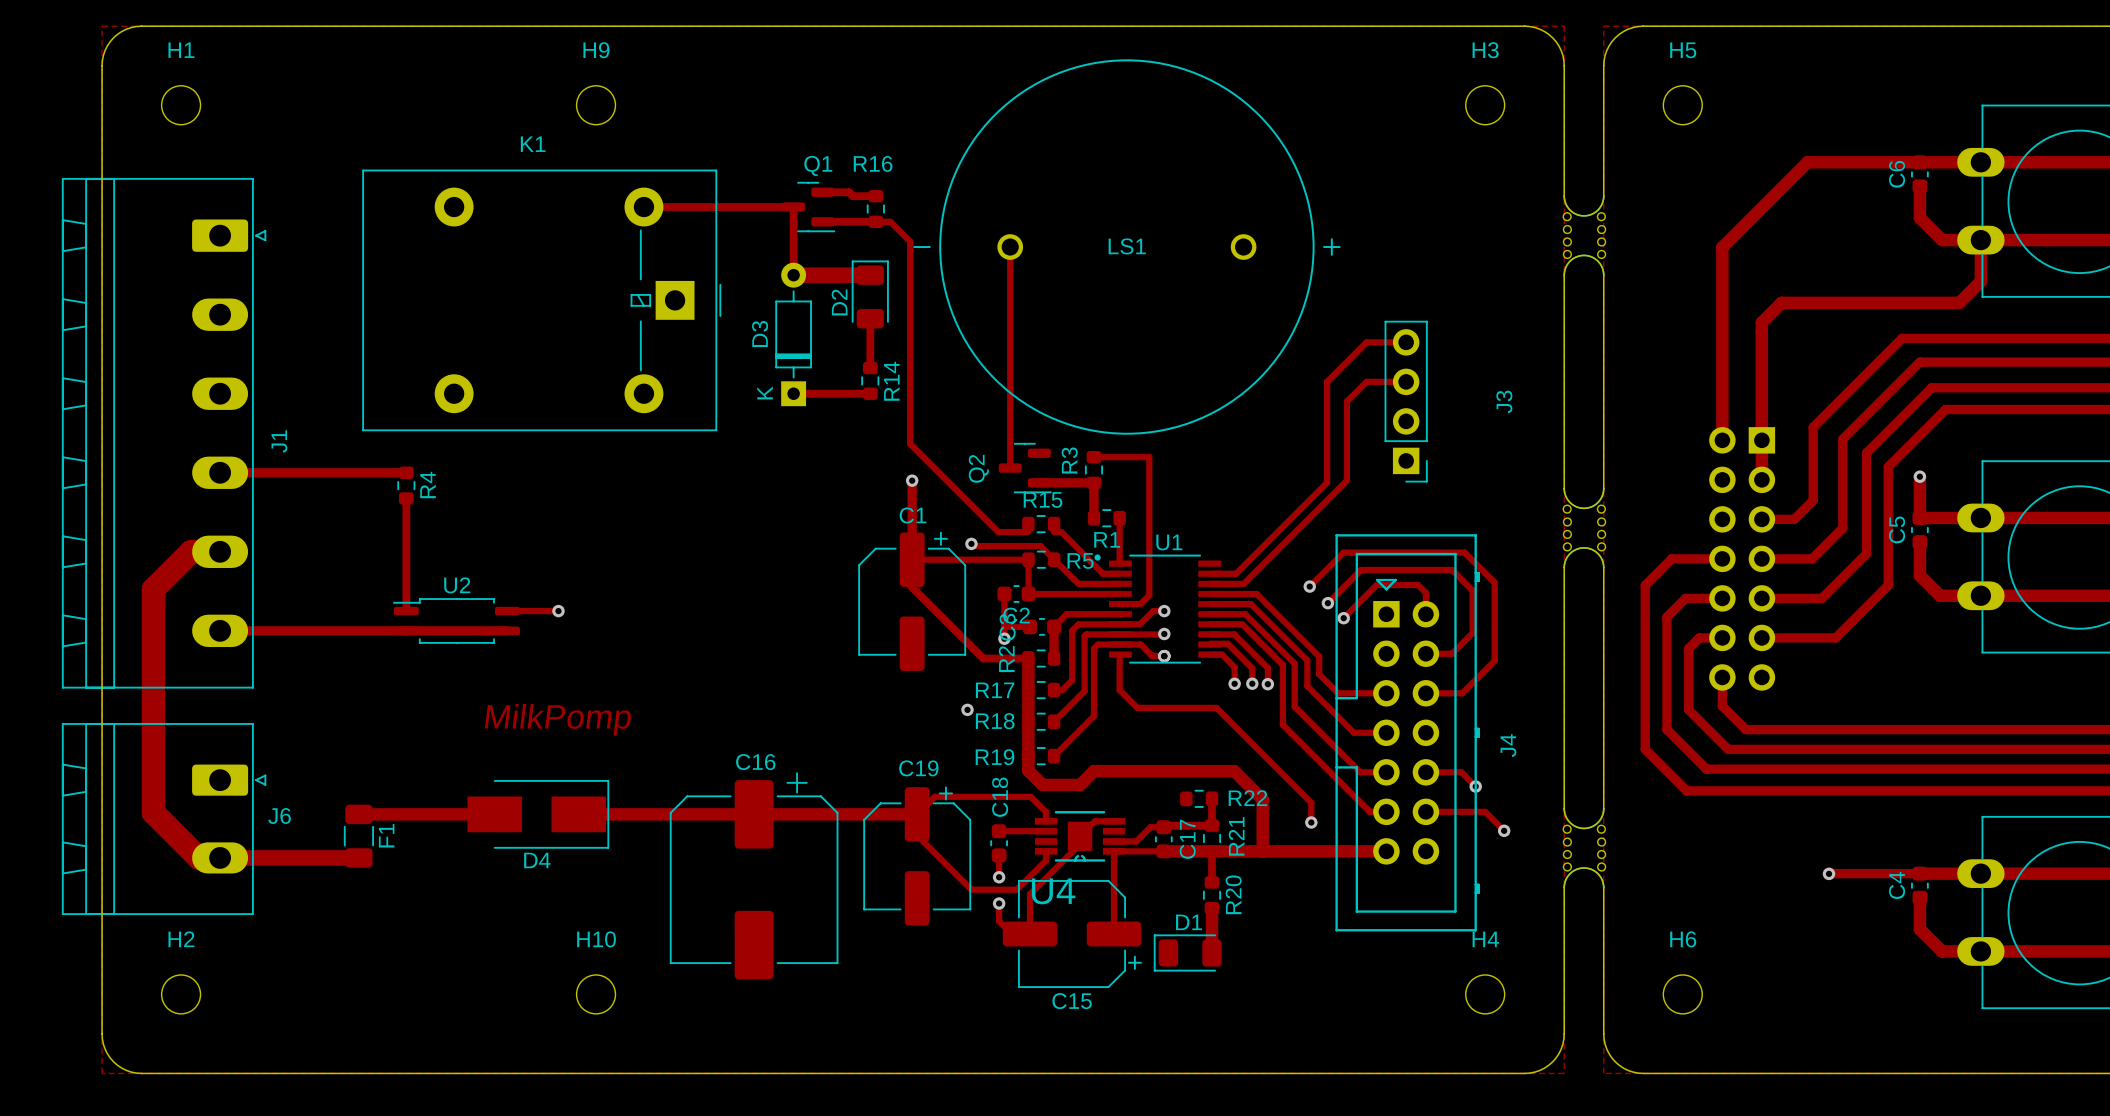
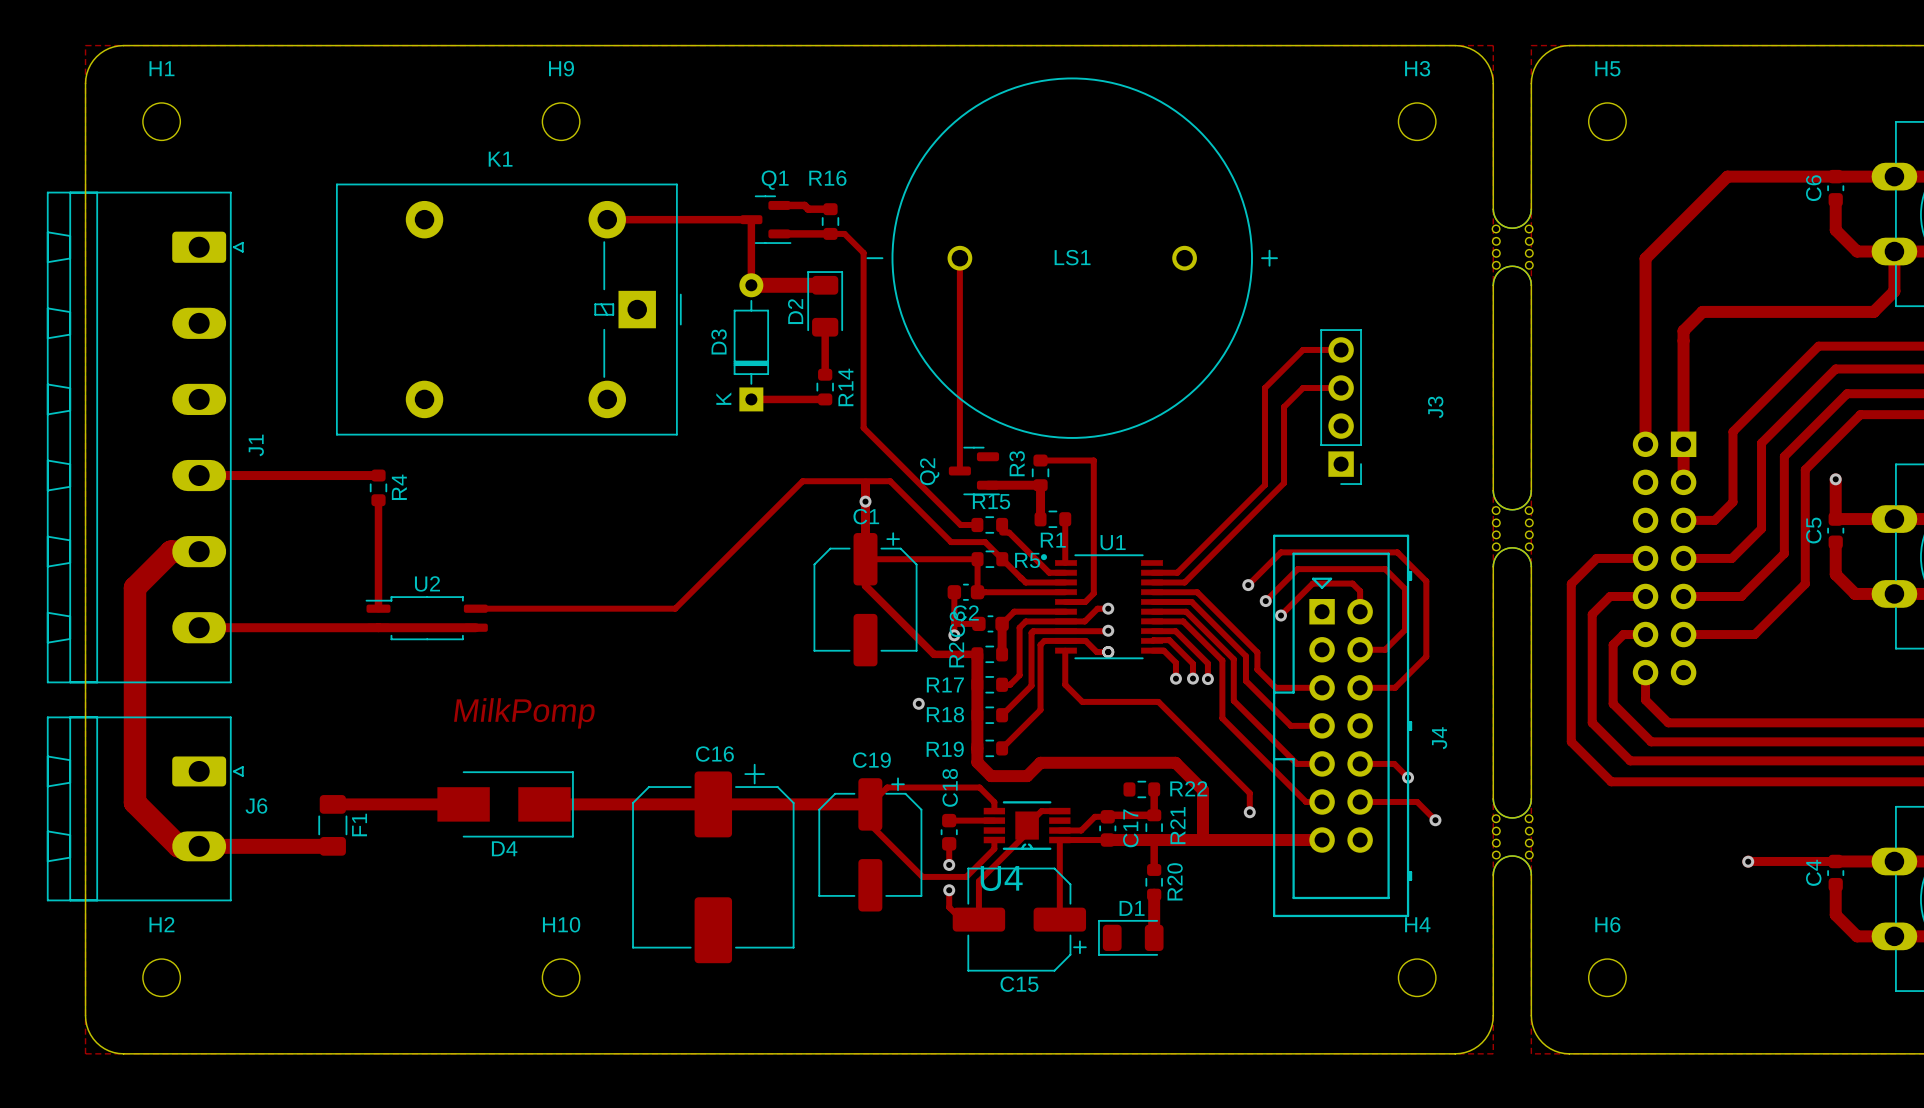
track: (910, 423) (910, 443) (998, 532) (1028, 532) -> (863, 427) (960, 524) (977, 524)
via position: (912, 480) -> (865, 501)
track: (971, 543) (973, 546) (1040, 546) -> (524, 608) (675, 608) (802, 481) (890, 481) (951, 542) (985, 542) (989, 546)
via: (971, 543) -> none
via: (558, 611) -> none

